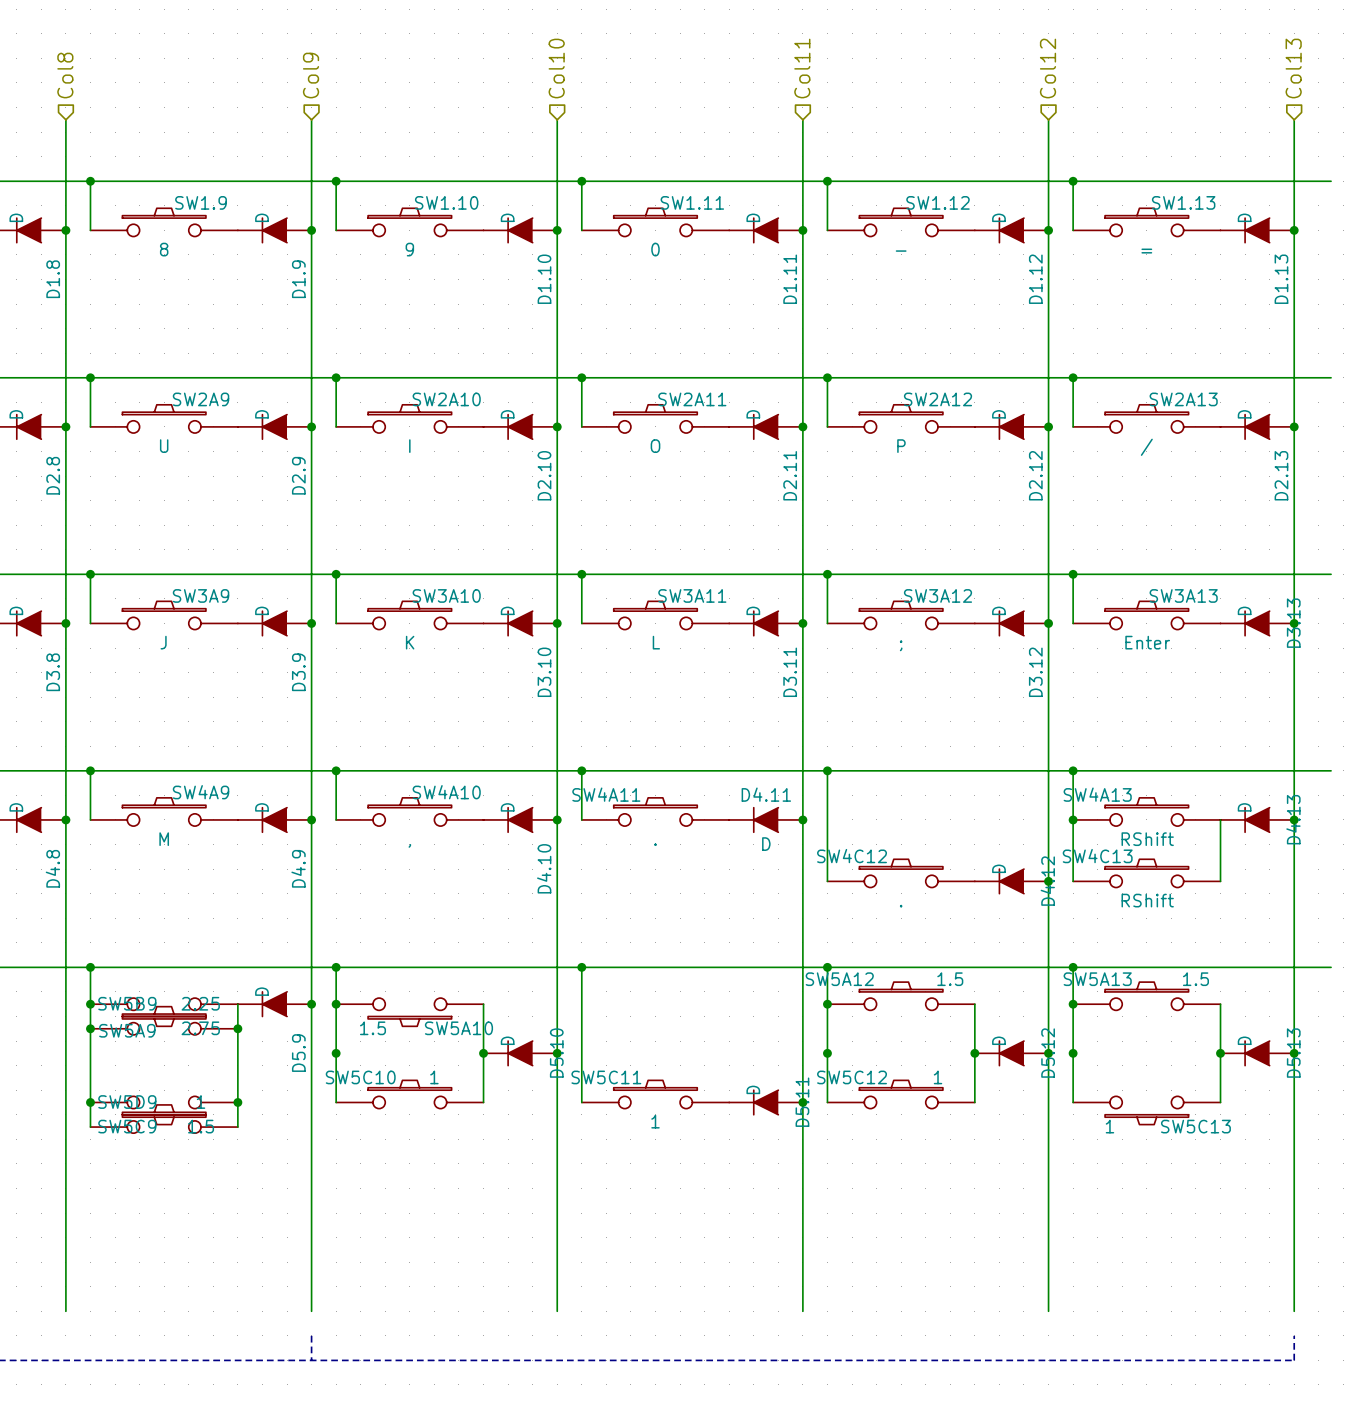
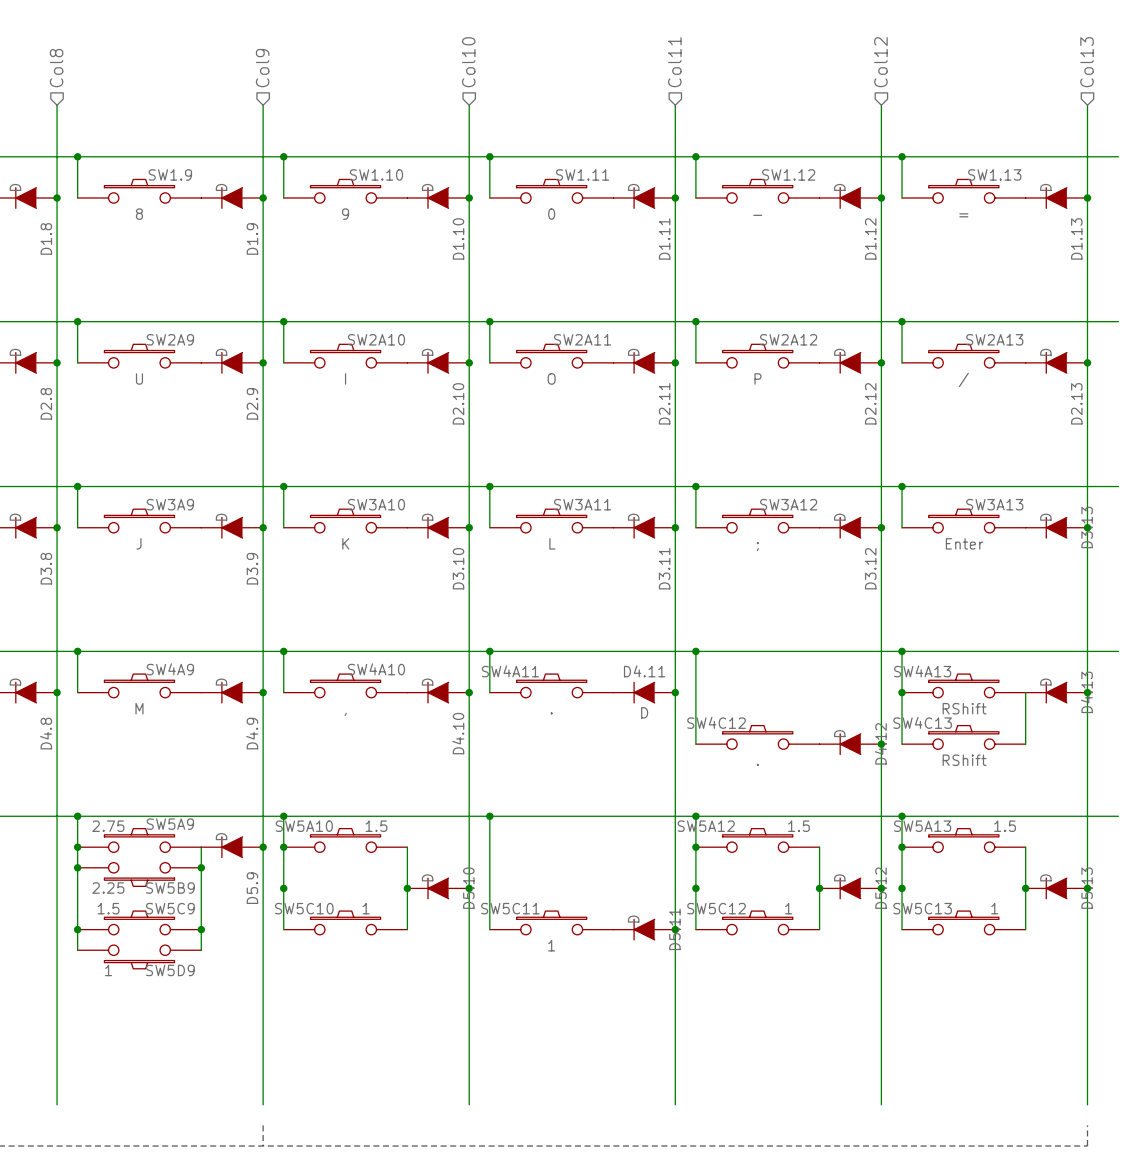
SW5B9 rotation: 0° (164, 1011) -> 180° (139, 882)
SW5A9 rotation: 0° (164, 1021) -> 180° (139, 832)
SW5A10 rotation: 0° (409, 1021) -> 180° (345, 832)
SW5D9 rotation: 0° (164, 1109) -> 180° (139, 964)
SW5C9 rotation: 0° (164, 1119) -> 180° (139, 915)
SW5C13 rotation: 0° (1146, 1119) -> 180° (963, 915)

